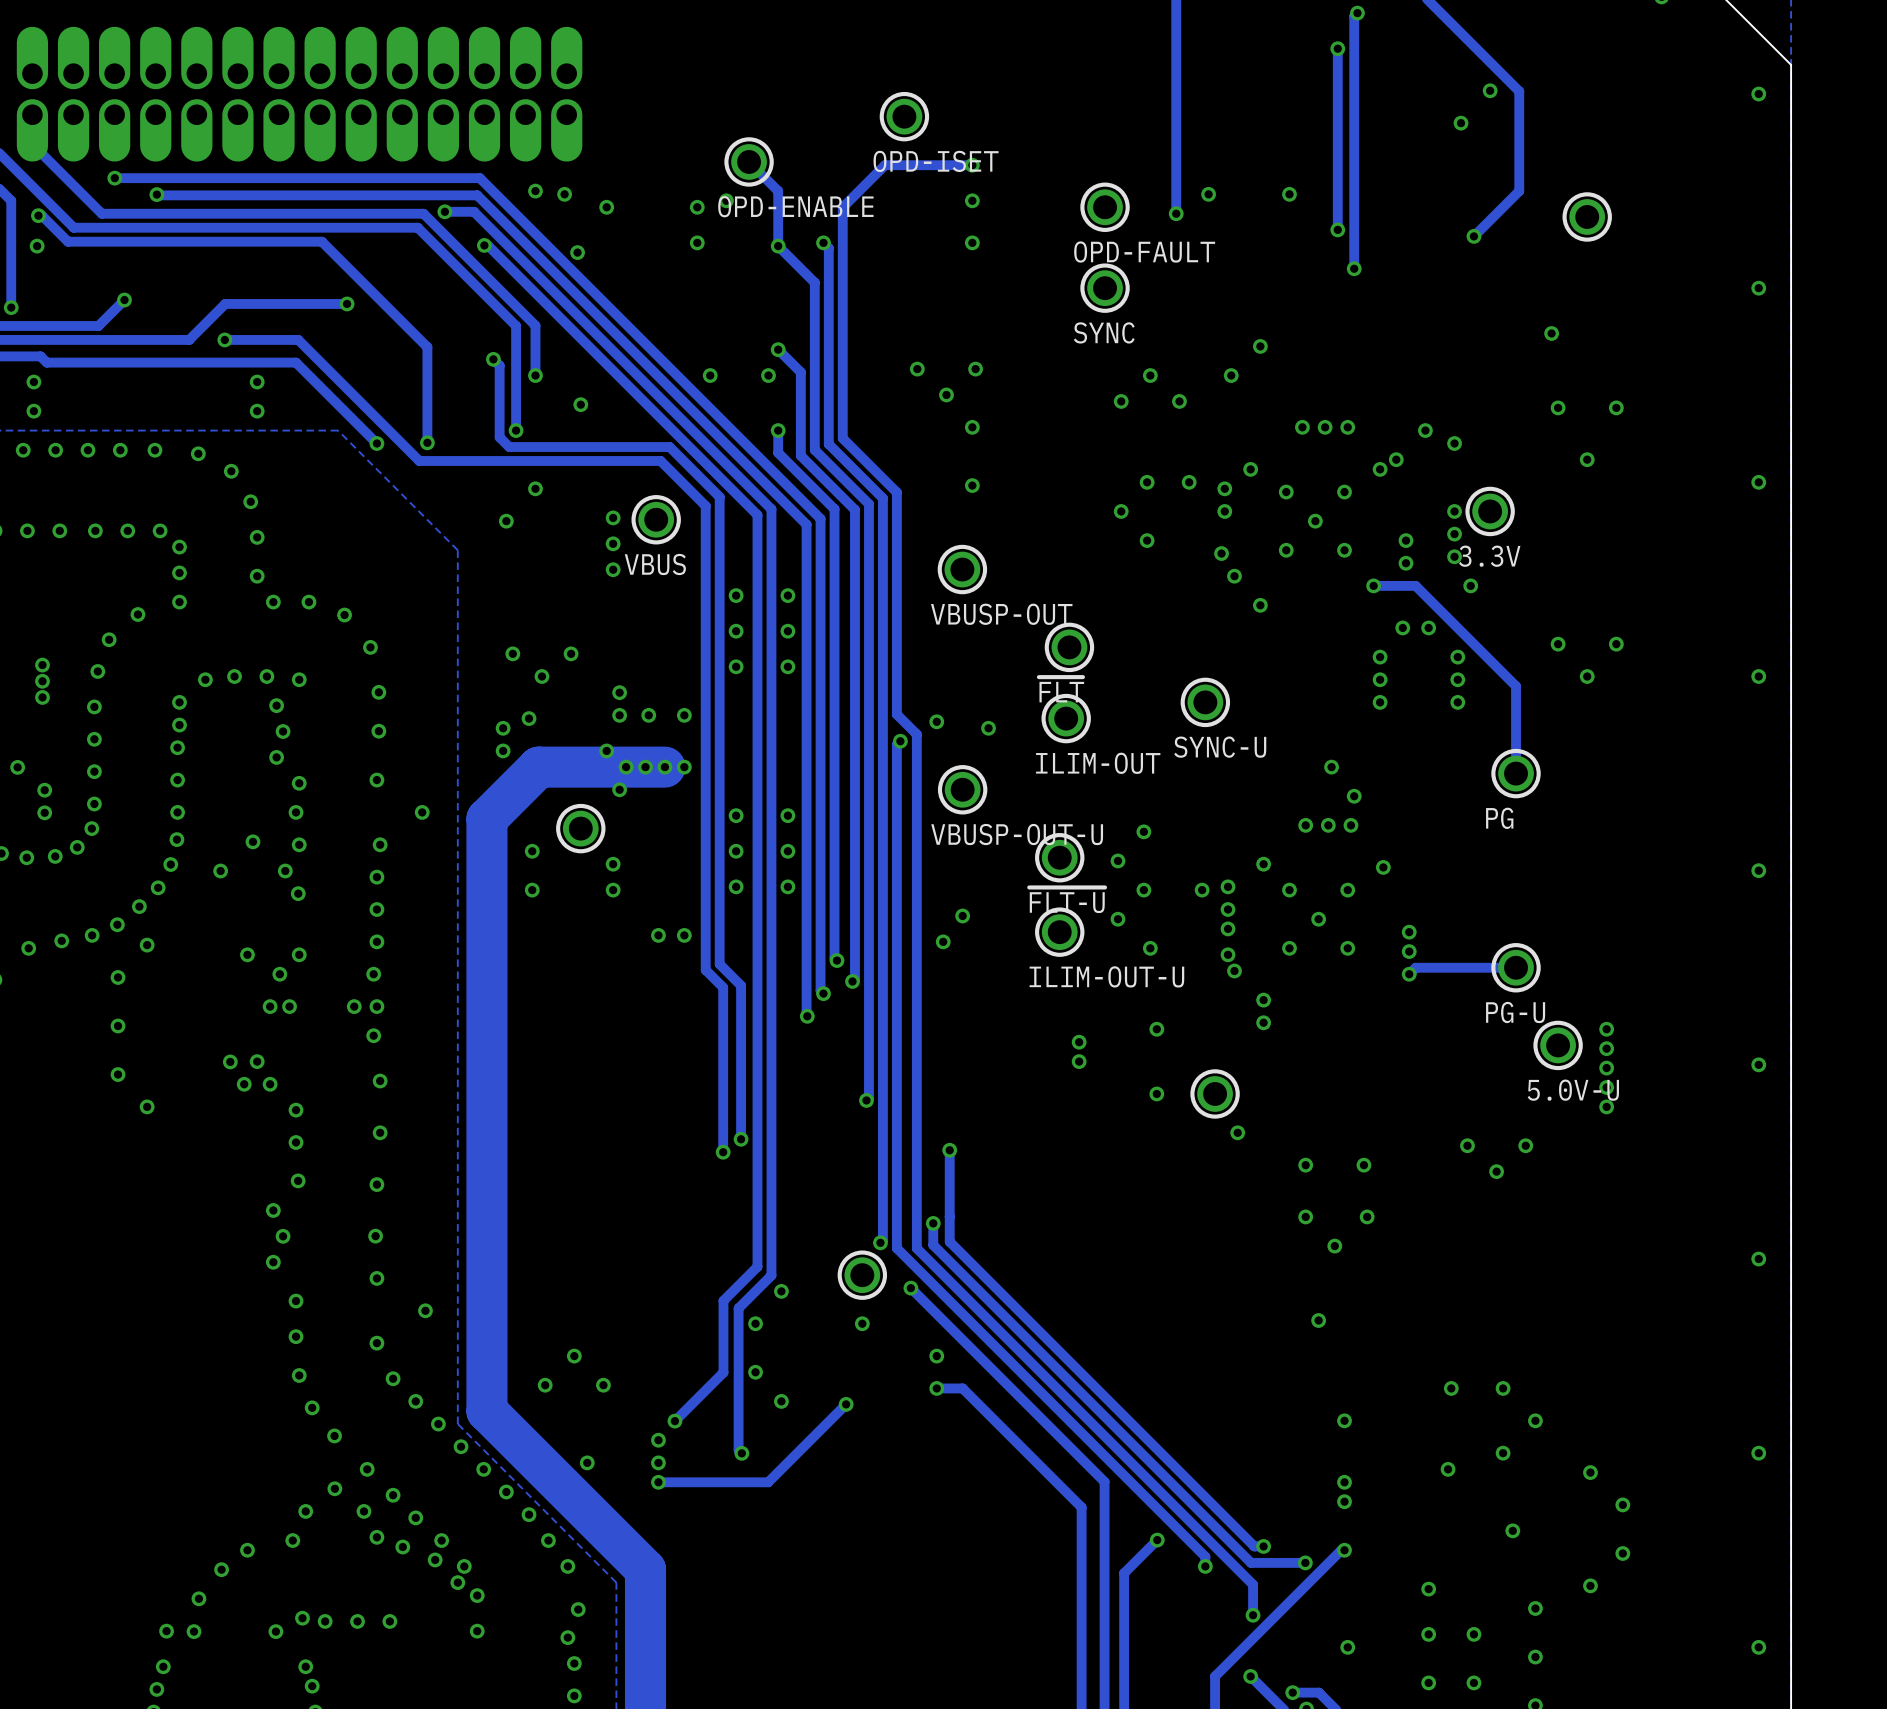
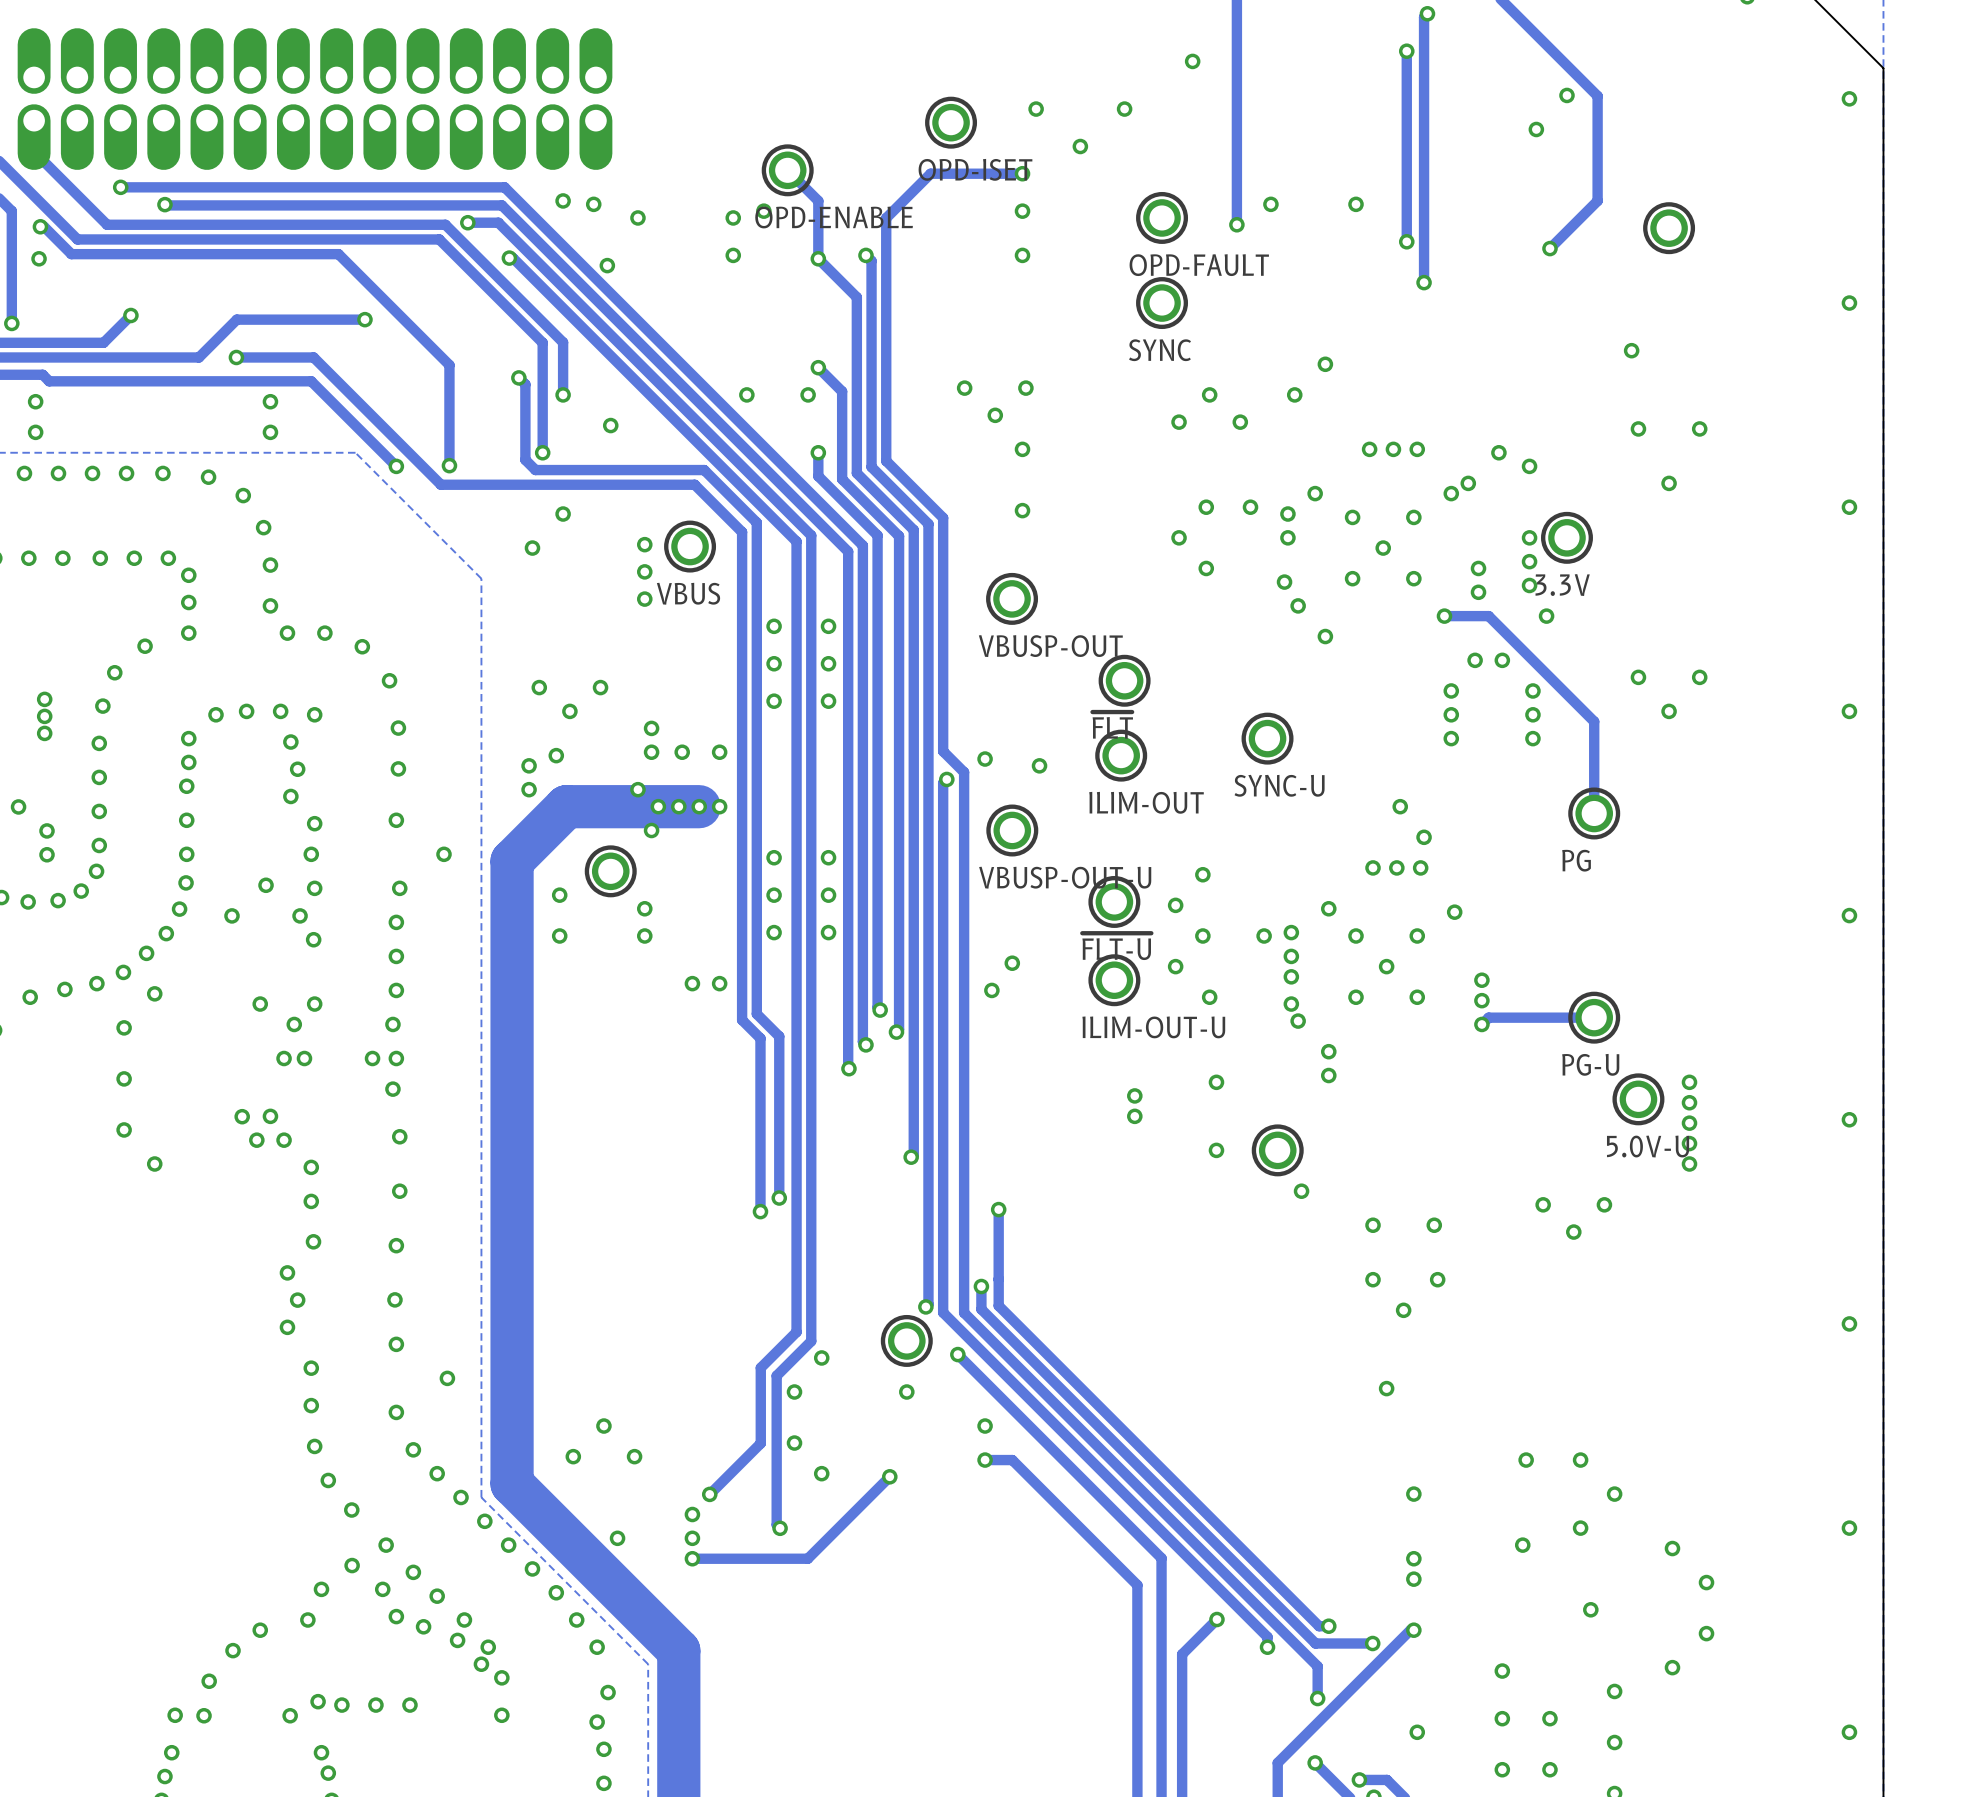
via: none -> (1192, 61)
via: none -> (1036, 109)
via: none -> (1124, 109)
via: none -> (1080, 146)

